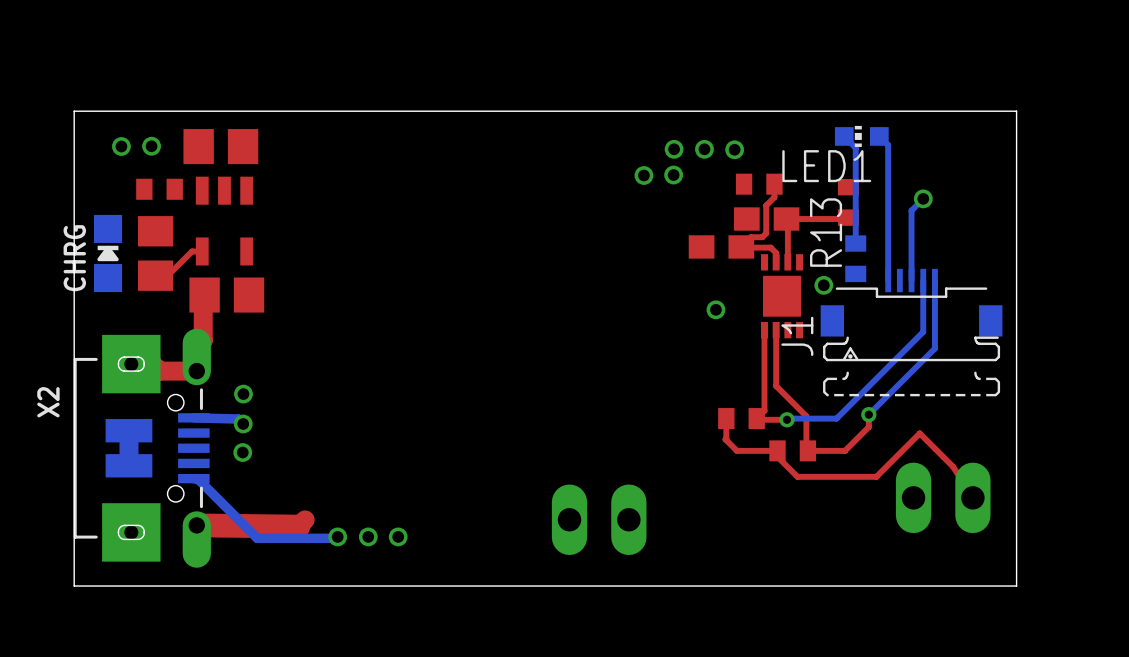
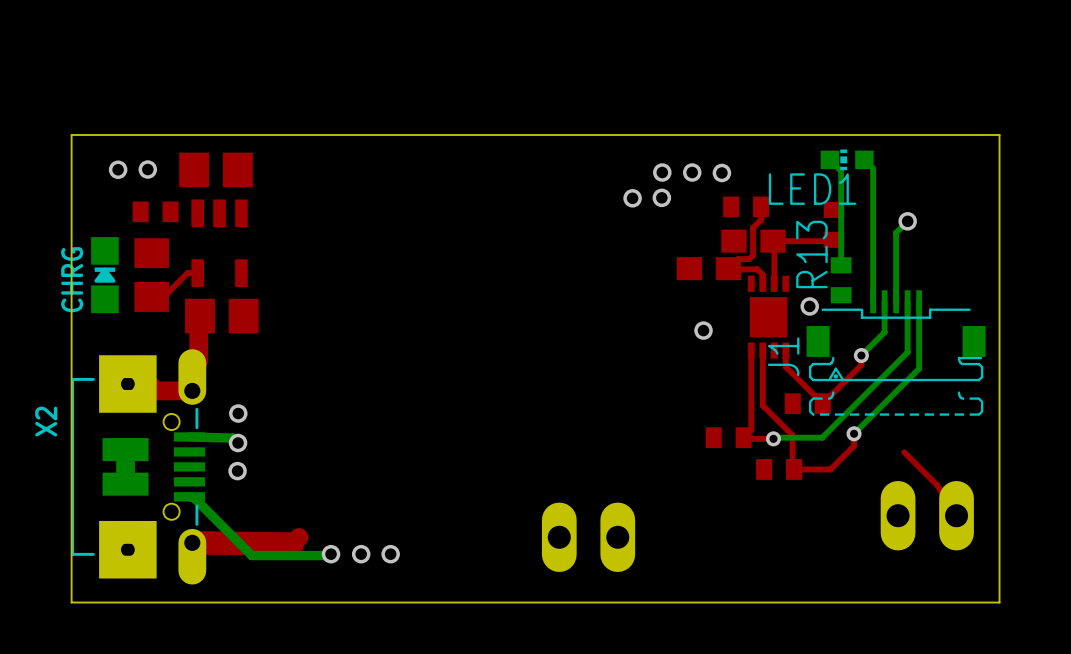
bottom track: none -> (884, 301) (884, 332) (861, 355)
top track: none -> (785, 350) (785, 366) (822, 403) (861, 365) (861, 355)
via: none -> (861, 355)
part: none -> (807, 403)
top track: (726, 418) (725, 439) (736, 450) (777, 450) (777, 456) (797, 476) (876, 476) (919, 433) -> none

